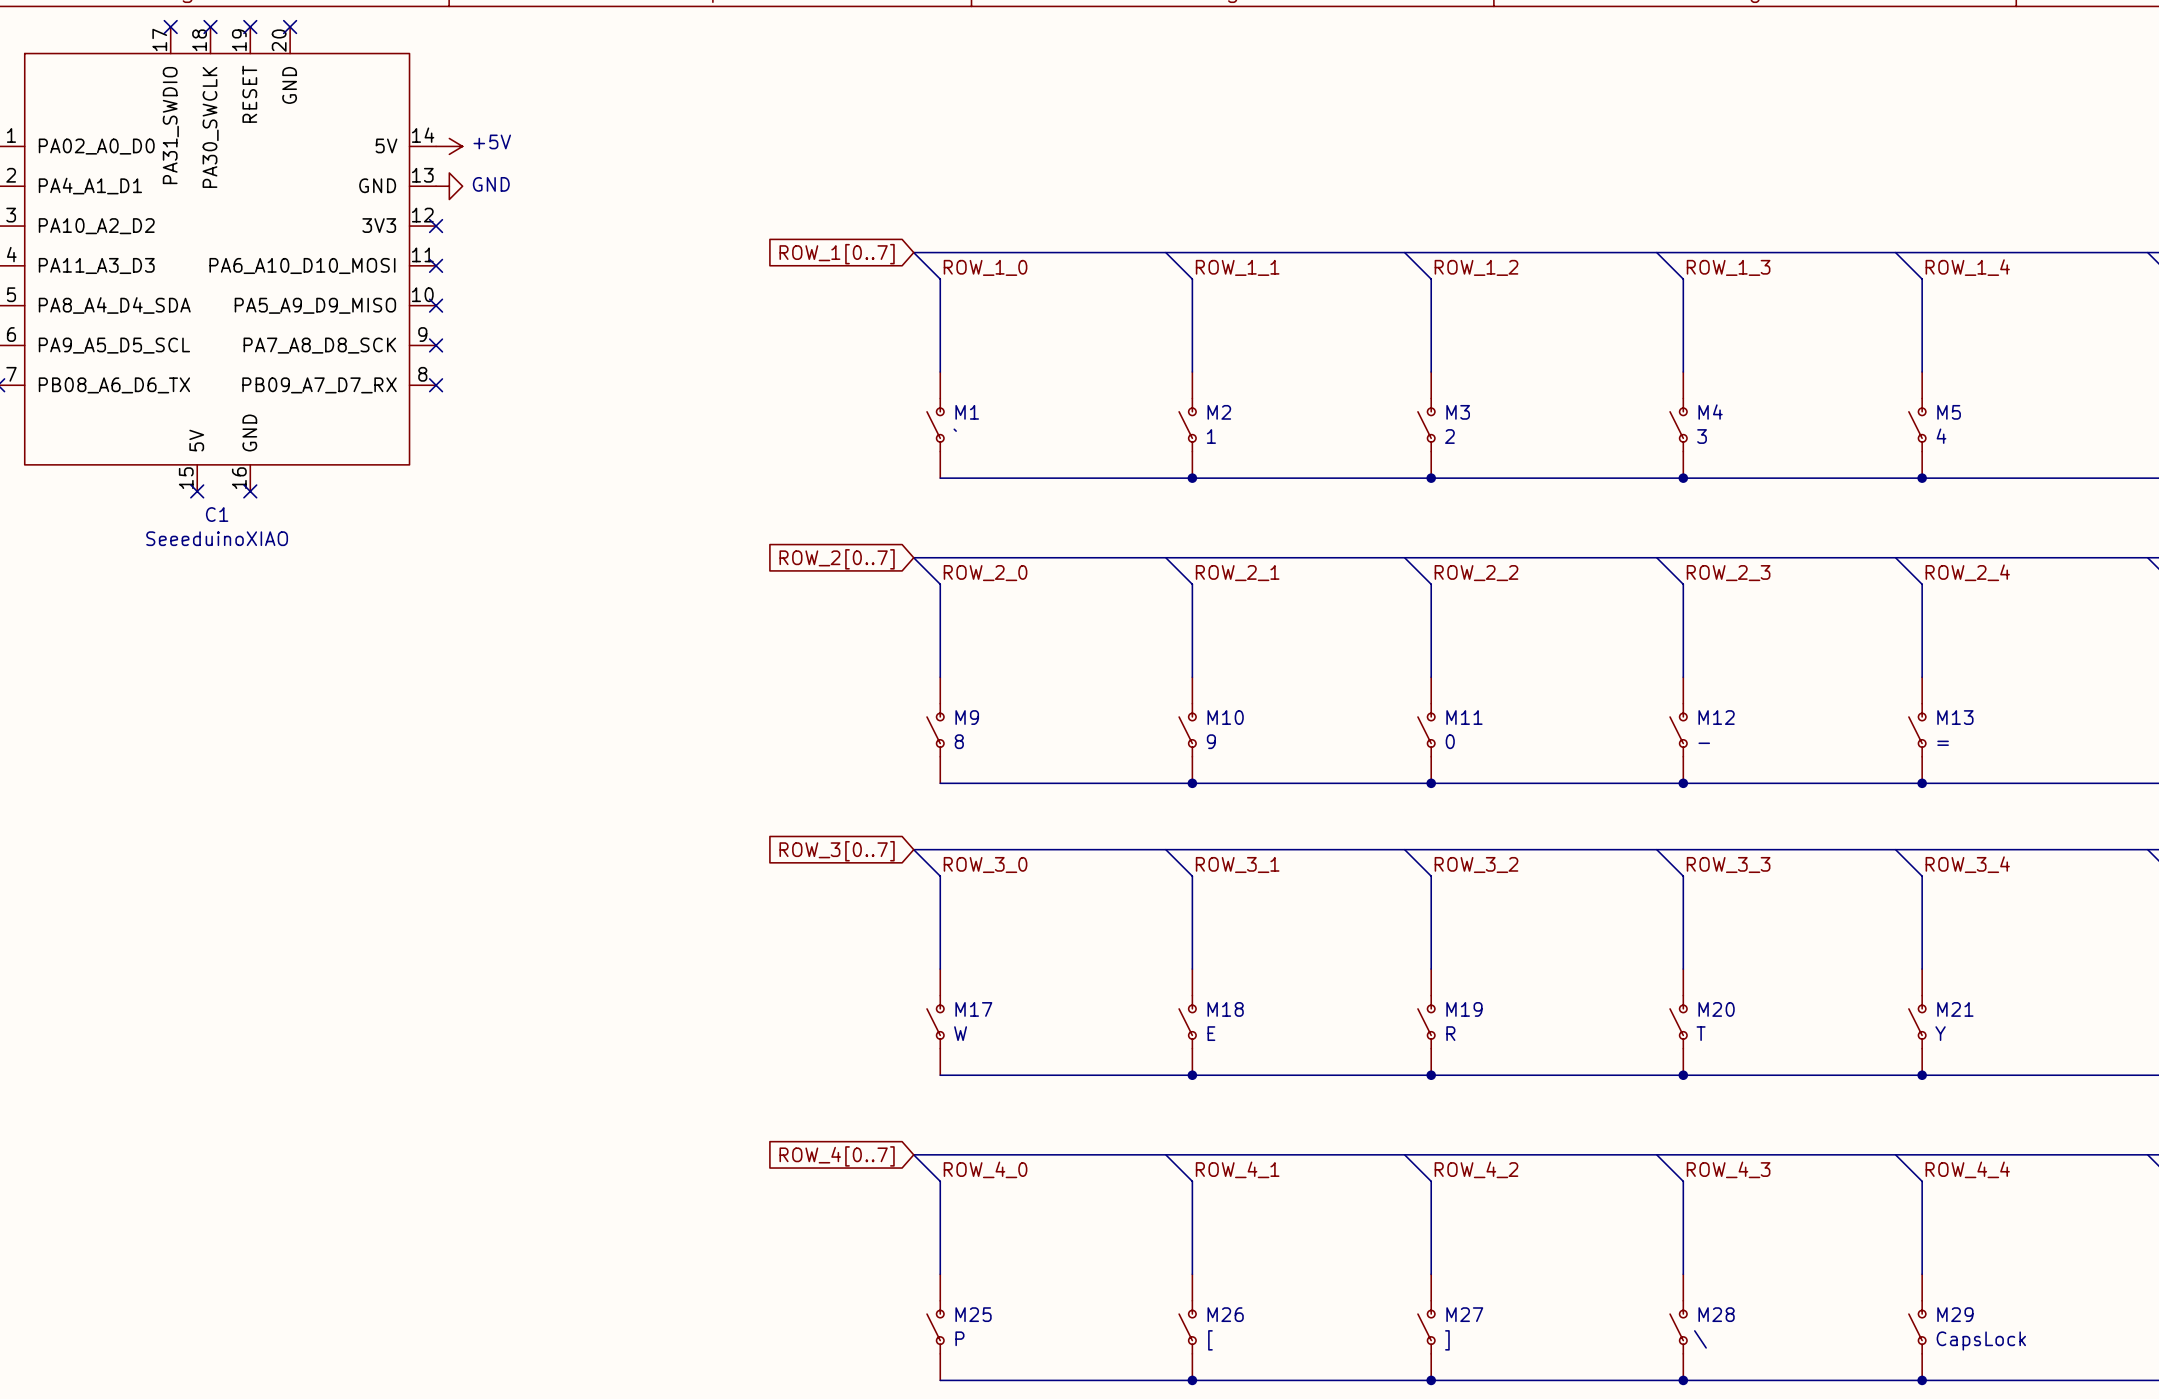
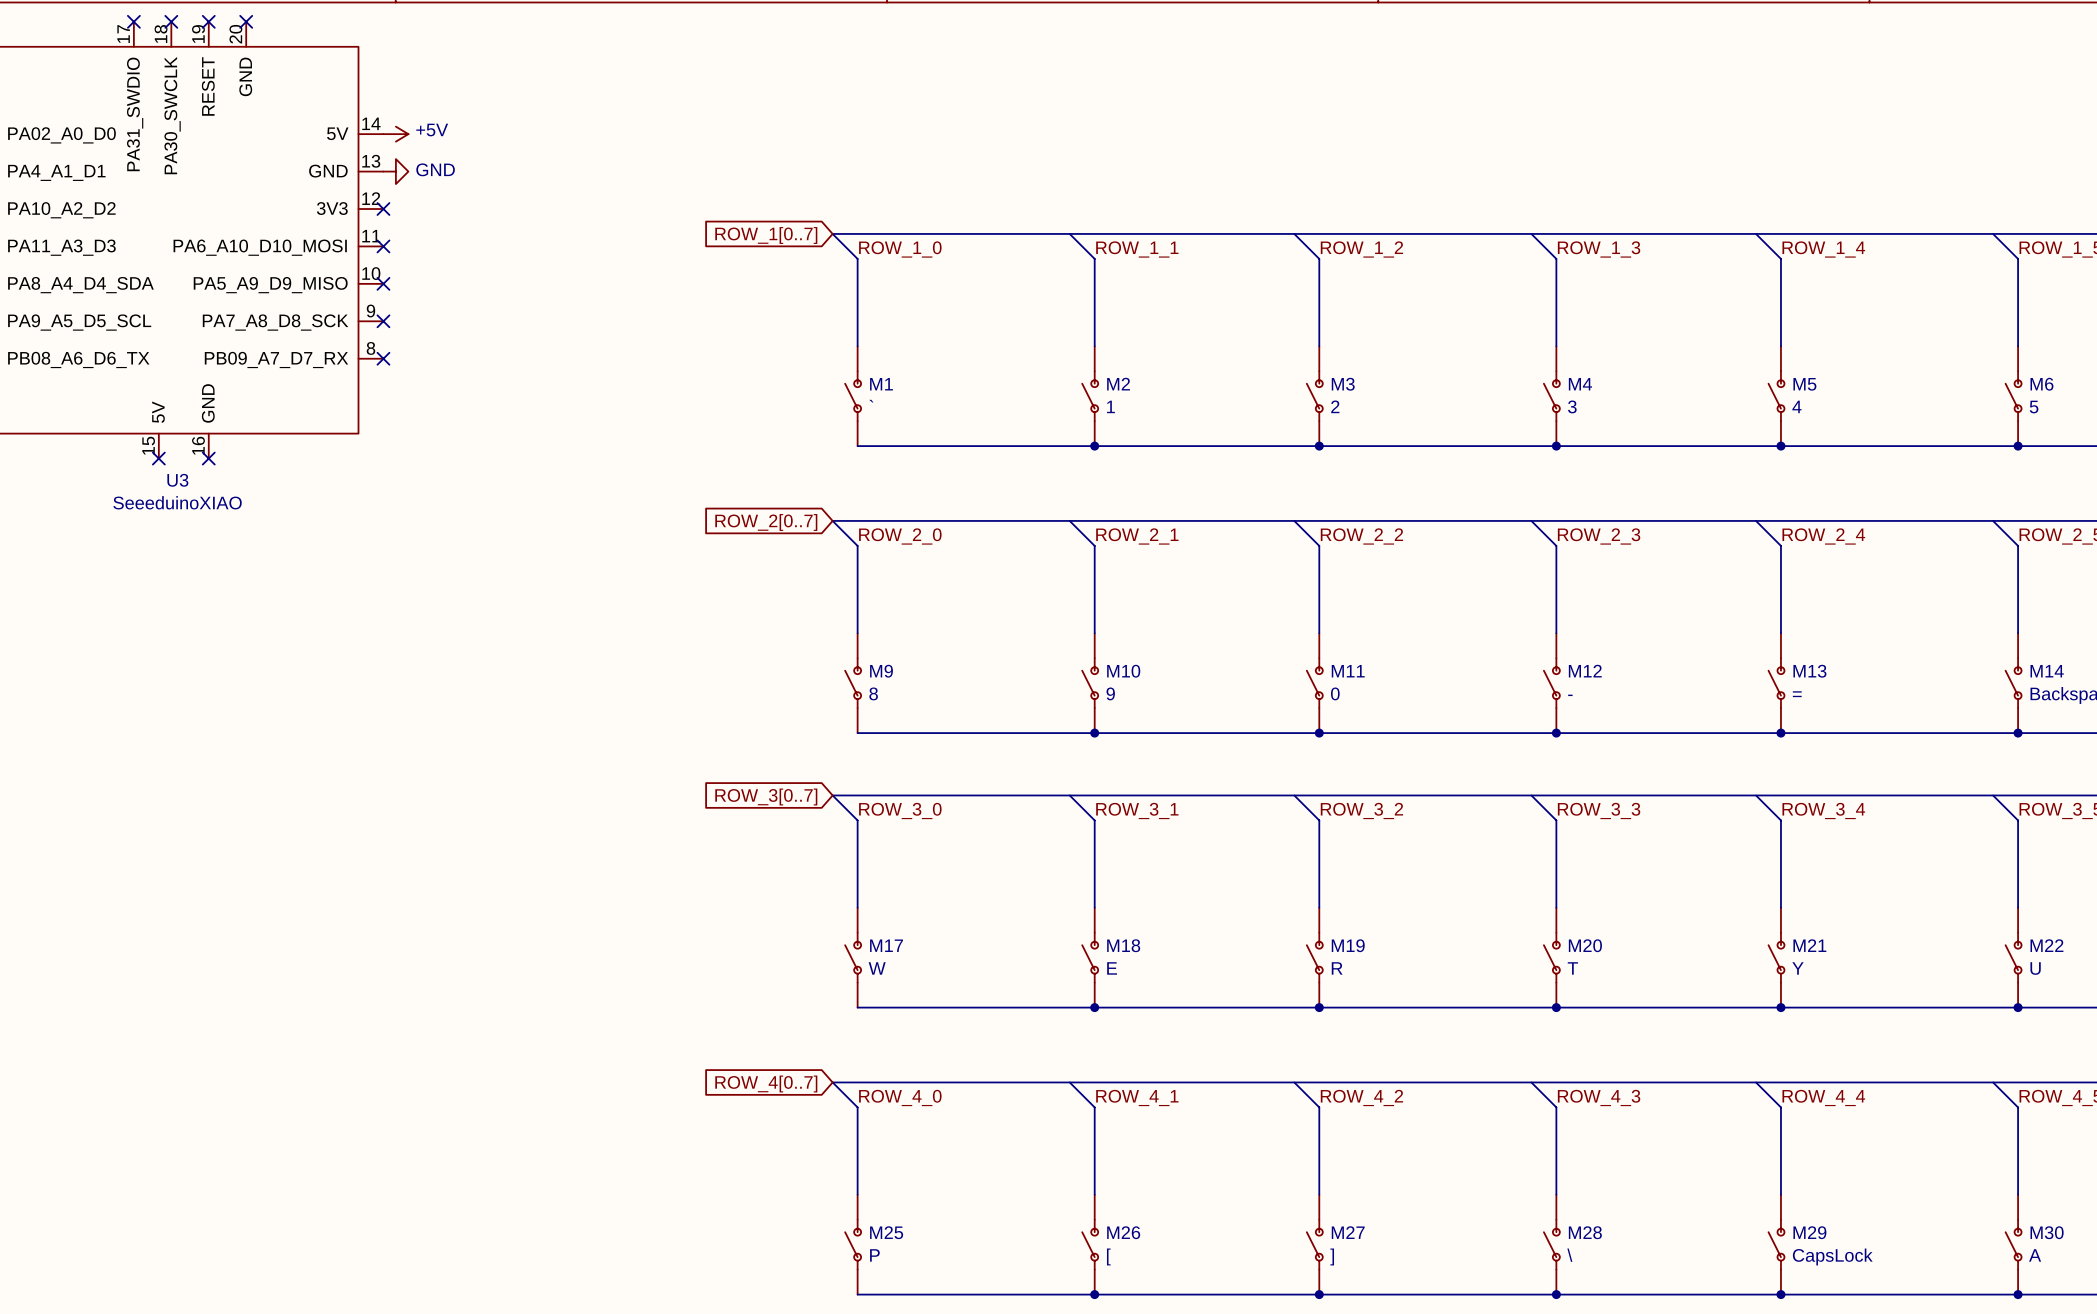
C1 name: C1 (217, 514) -> U3 (177, 480)

